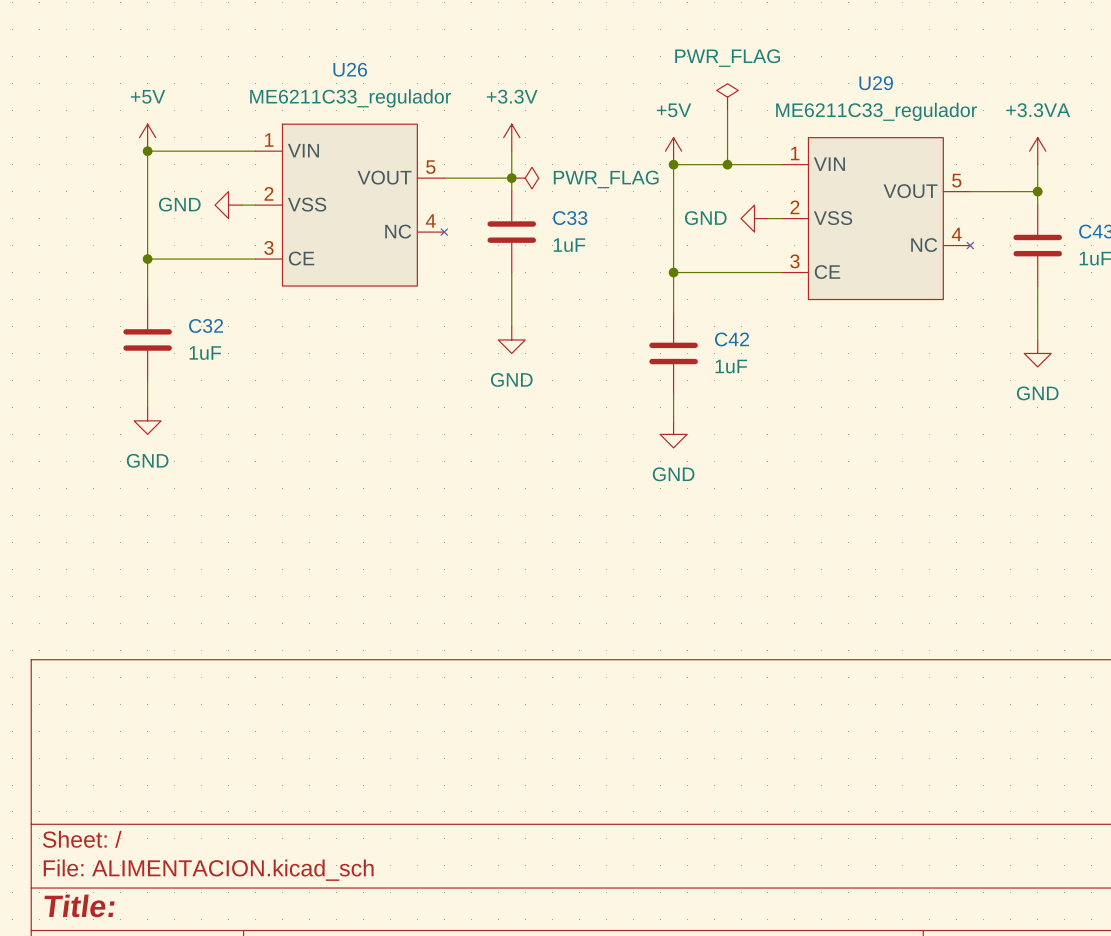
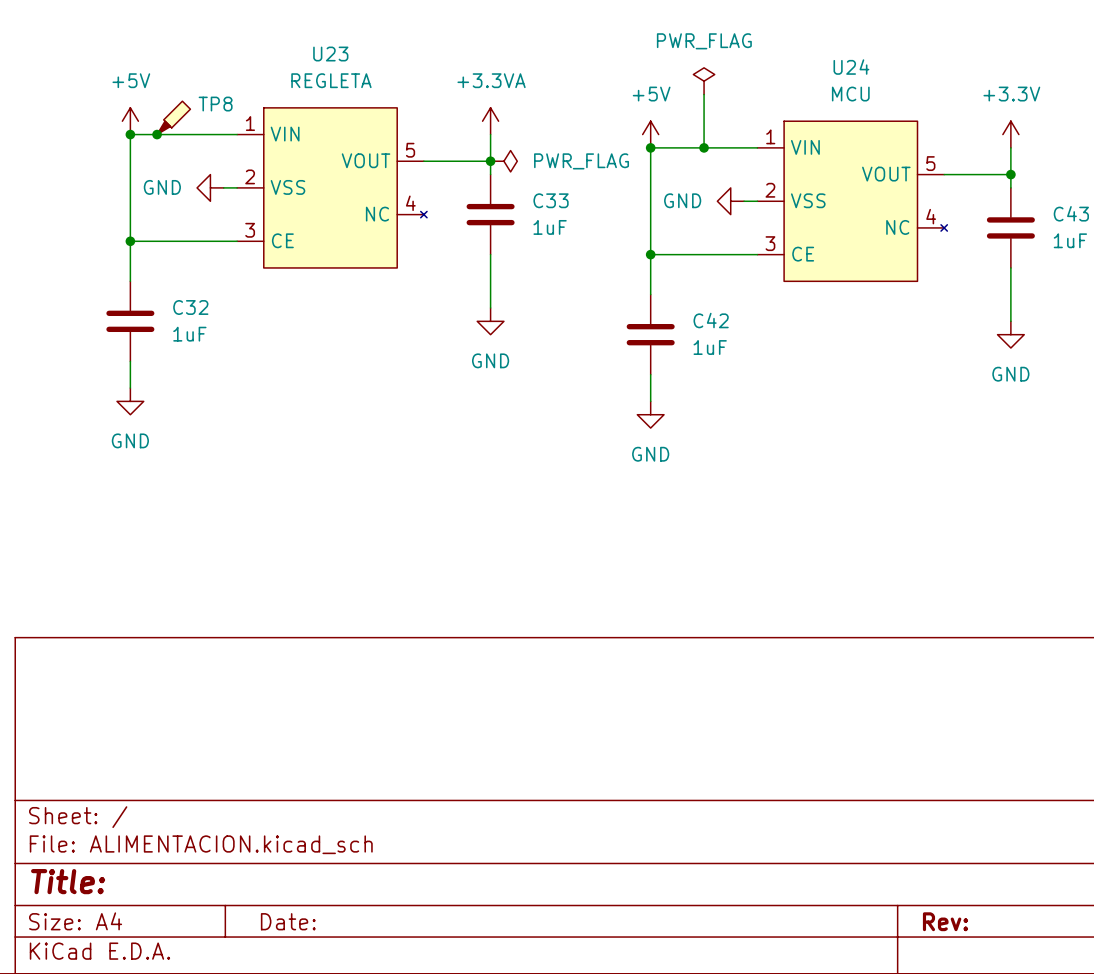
U26 name: U26 (350, 69) -> U23 (330, 54)
U29 name: U29 (876, 83) -> U24 (851, 67)
U26 value: ME6211C33_regulador (350, 98) -> REGLETA (331, 80)
U29 value: ME6211C33_regulador (876, 111) -> MCU (850, 94)
TP8: none -> (173, 117)
power symbol: +3.3V (511, 137) -> +3.3VA (490, 121)
junction: none -> (157, 134)
power symbol: +3.3VA (1037, 151) -> +3.3V (1010, 134)

